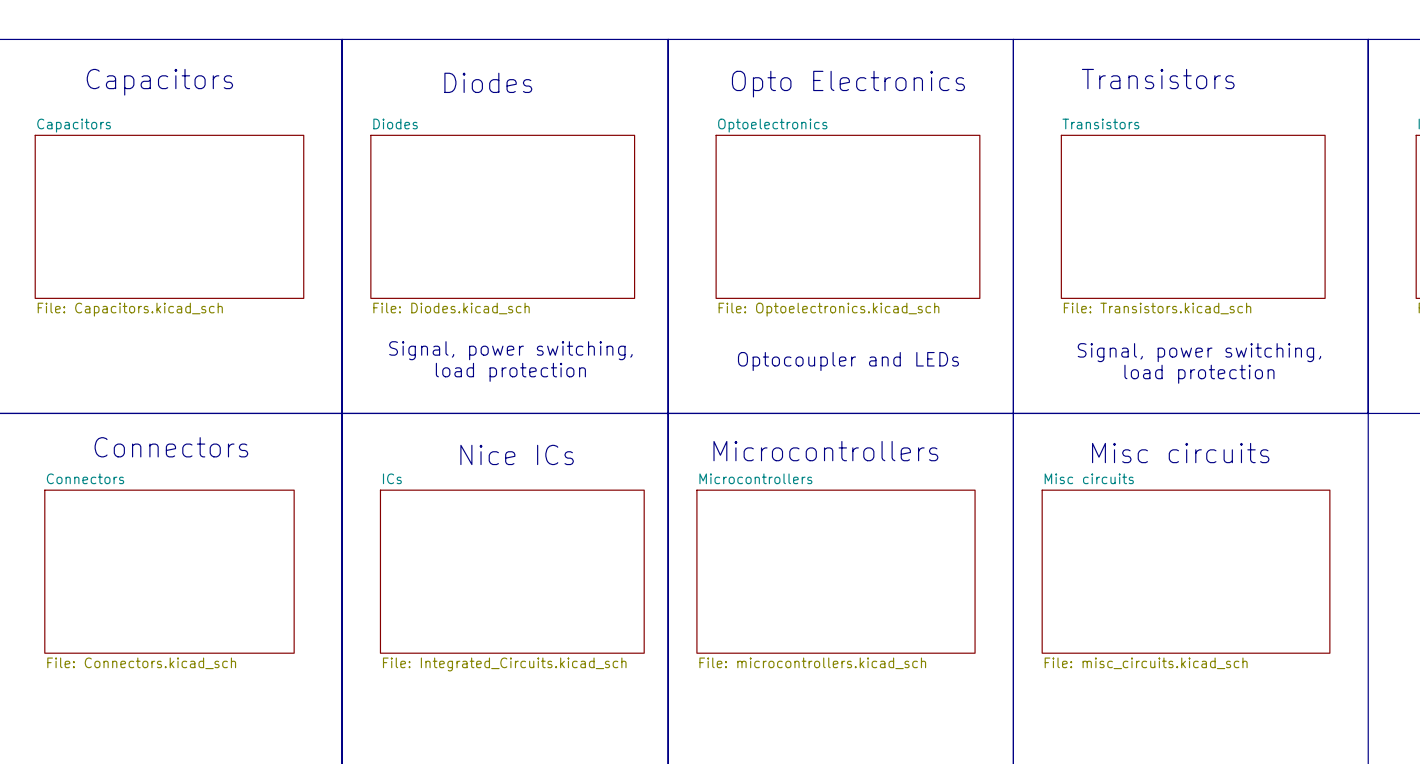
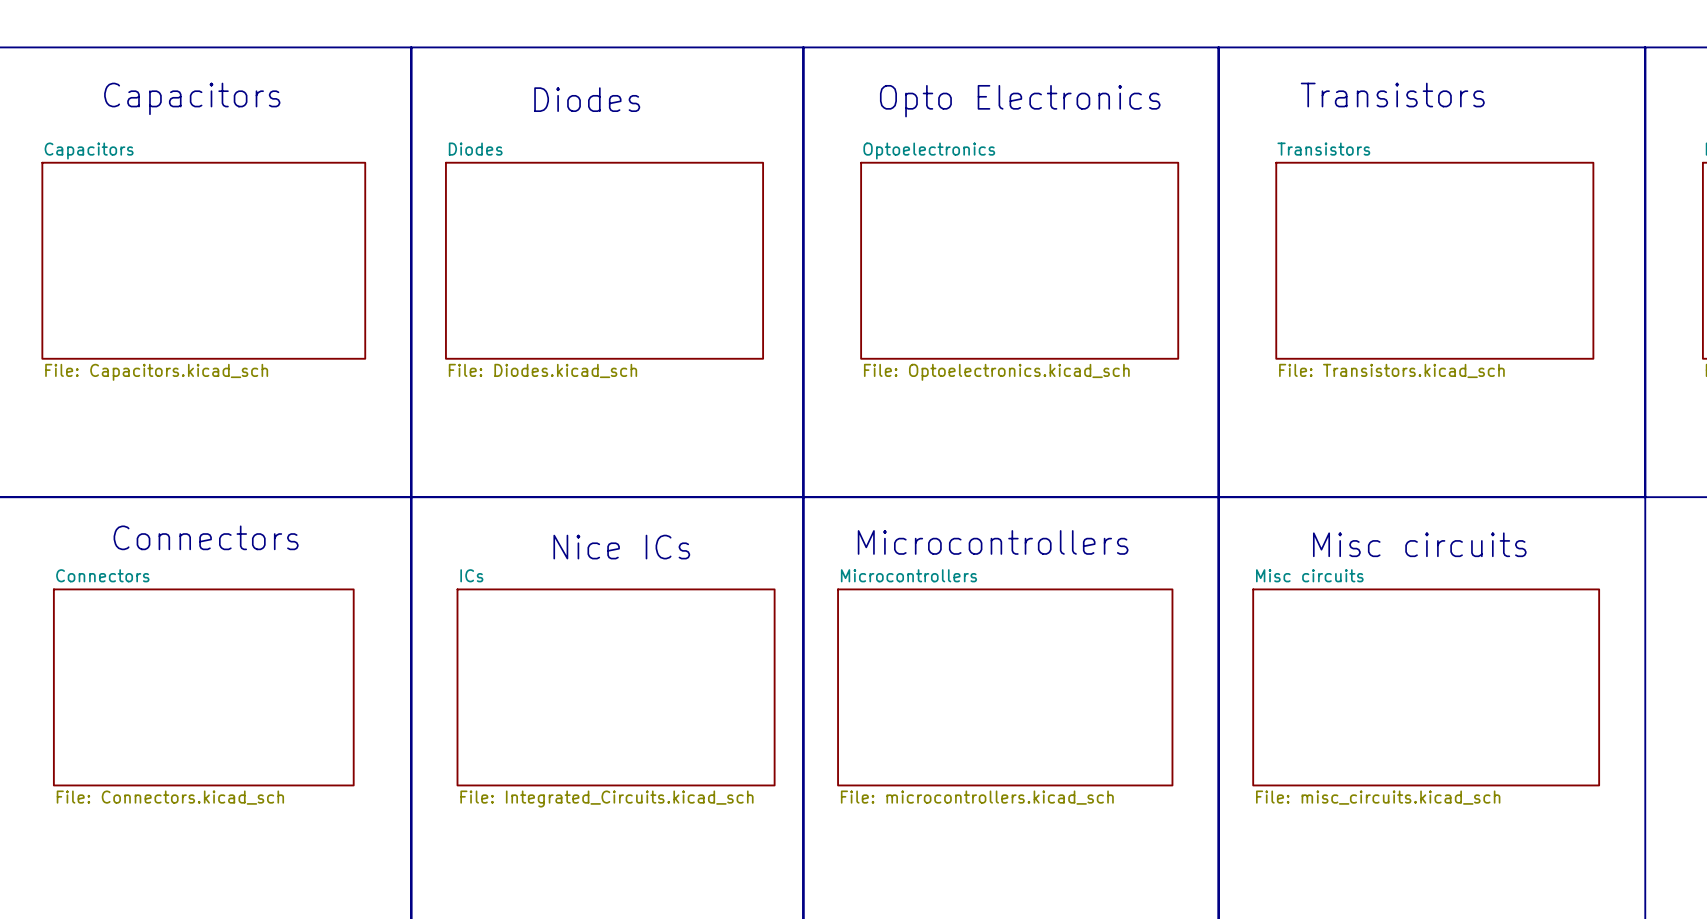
text: Signal, power switching, (510, 350) -> none
text: Signal, power switching, (1199, 352) -> none
text: Optocoupler and LEDs (848, 361) -> none
text: load protection (510, 372) -> none
text: load protection (1199, 374) -> none

